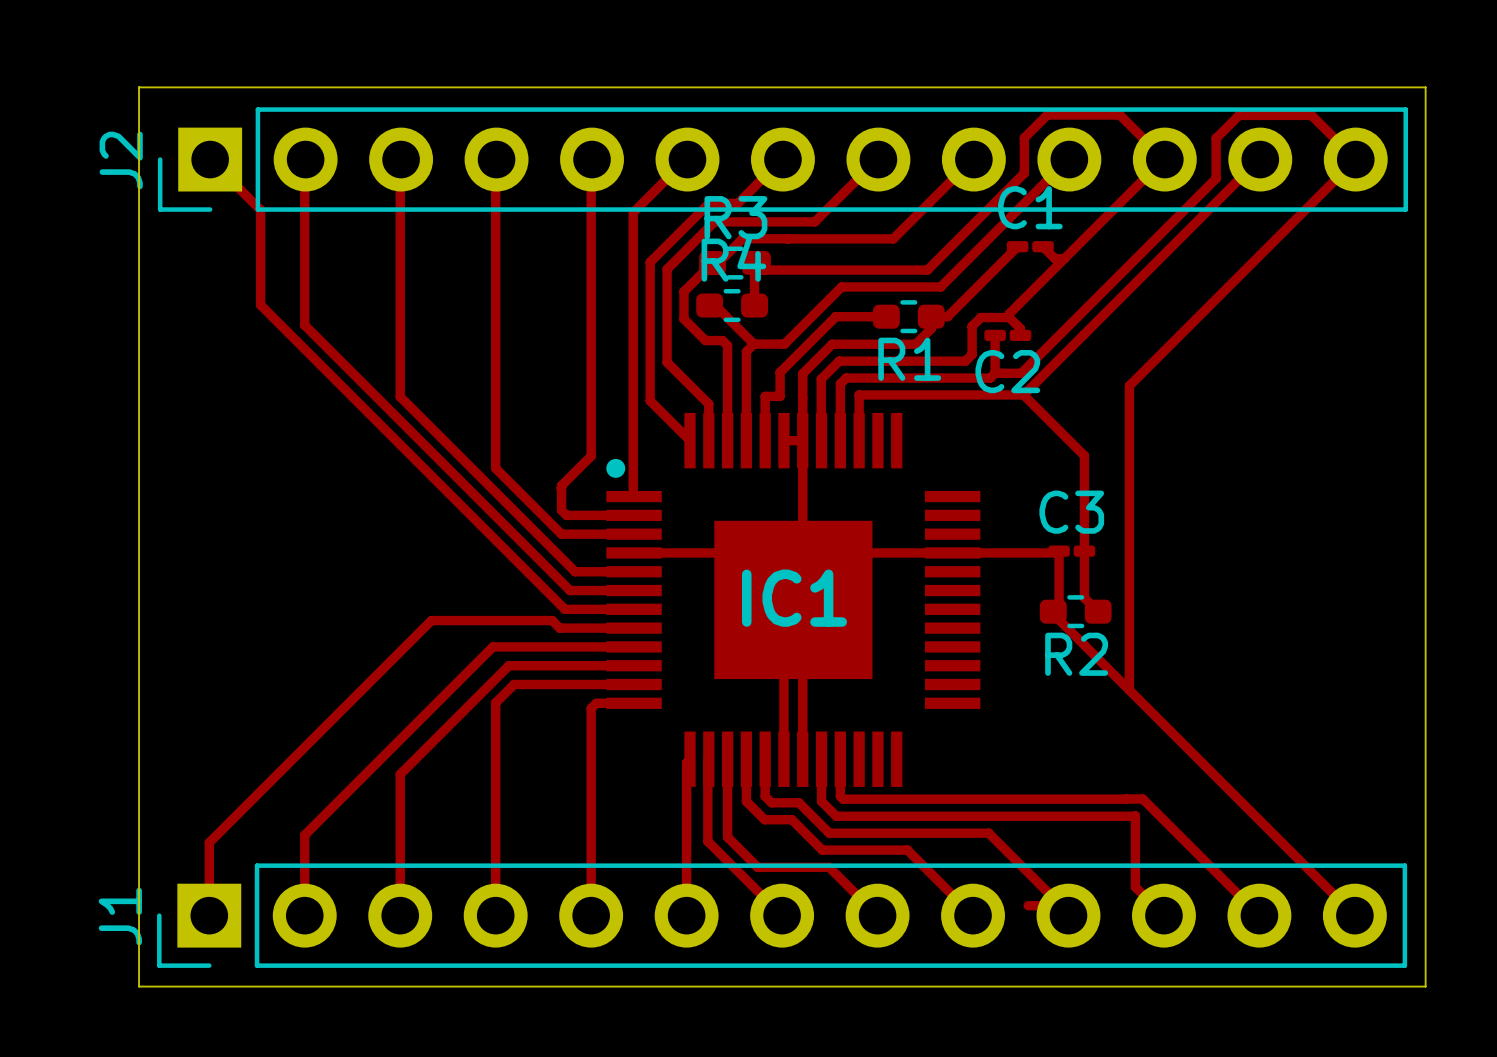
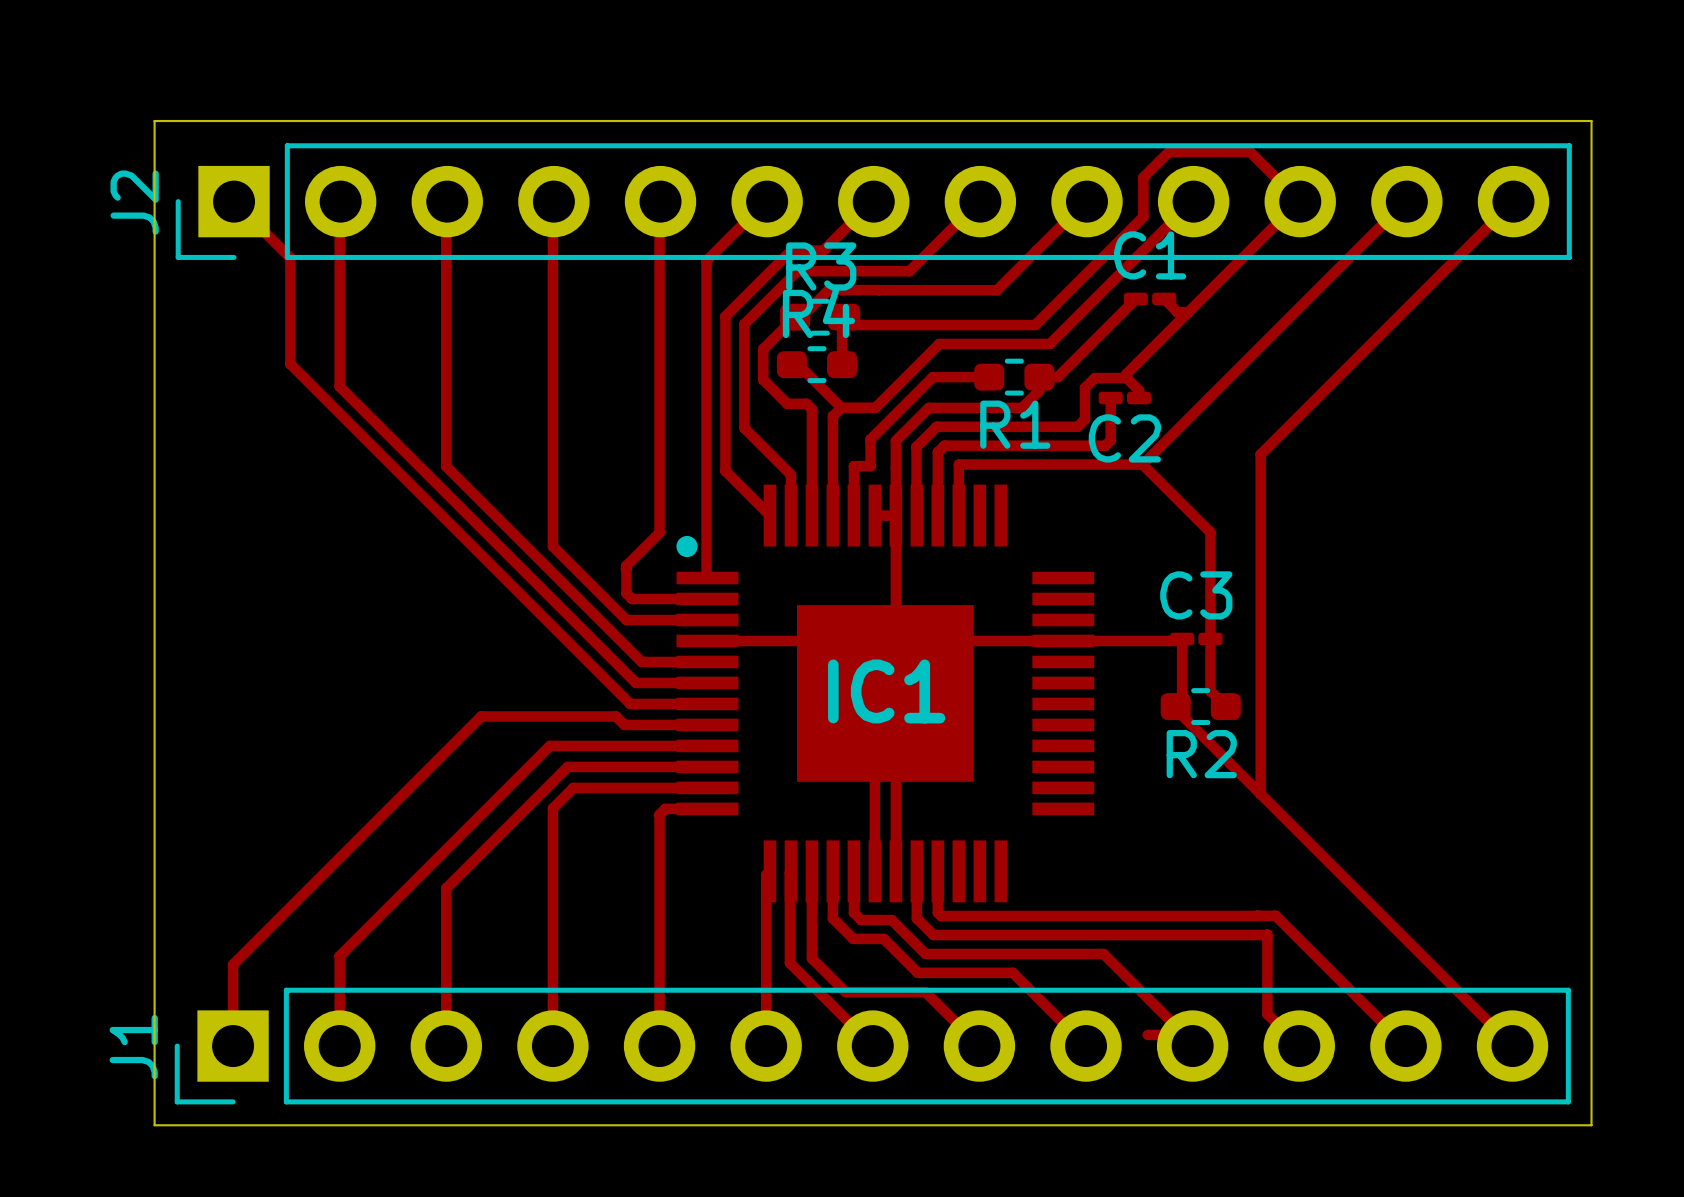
top track: (1355, 159) (1311, 115) (1239, 115) (1216, 138) (1216, 178) (1021, 373) (995, 373) -> none

